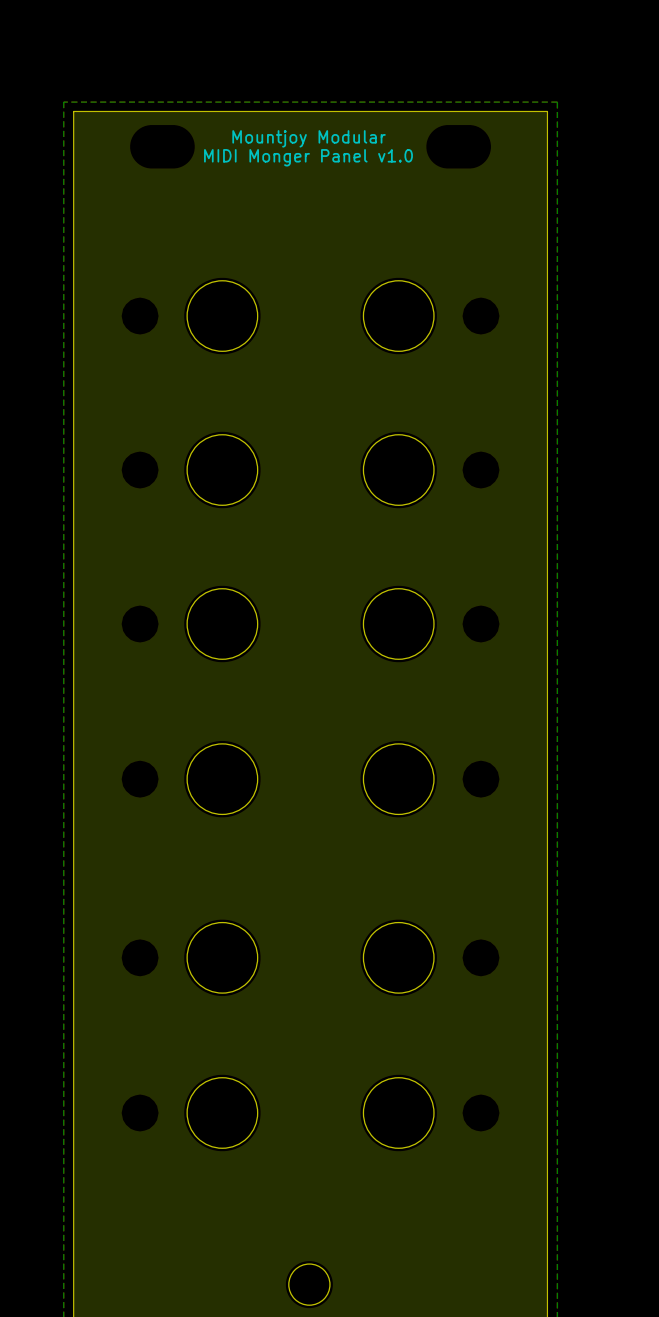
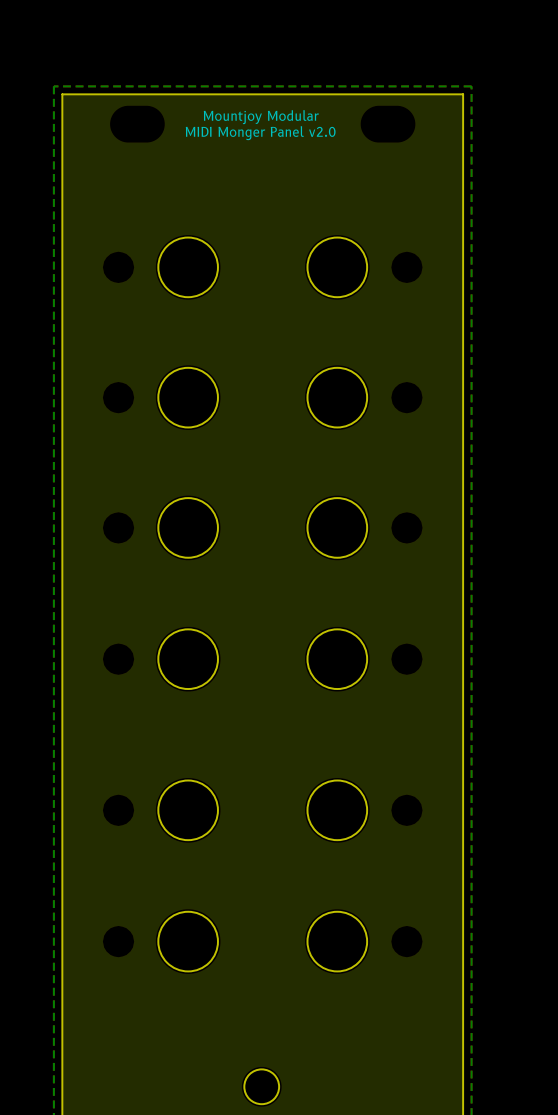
text: MIDI Monger Panel v1.0 (308, 157) -> MIDI Monger Panel v2.0 (260, 133)

